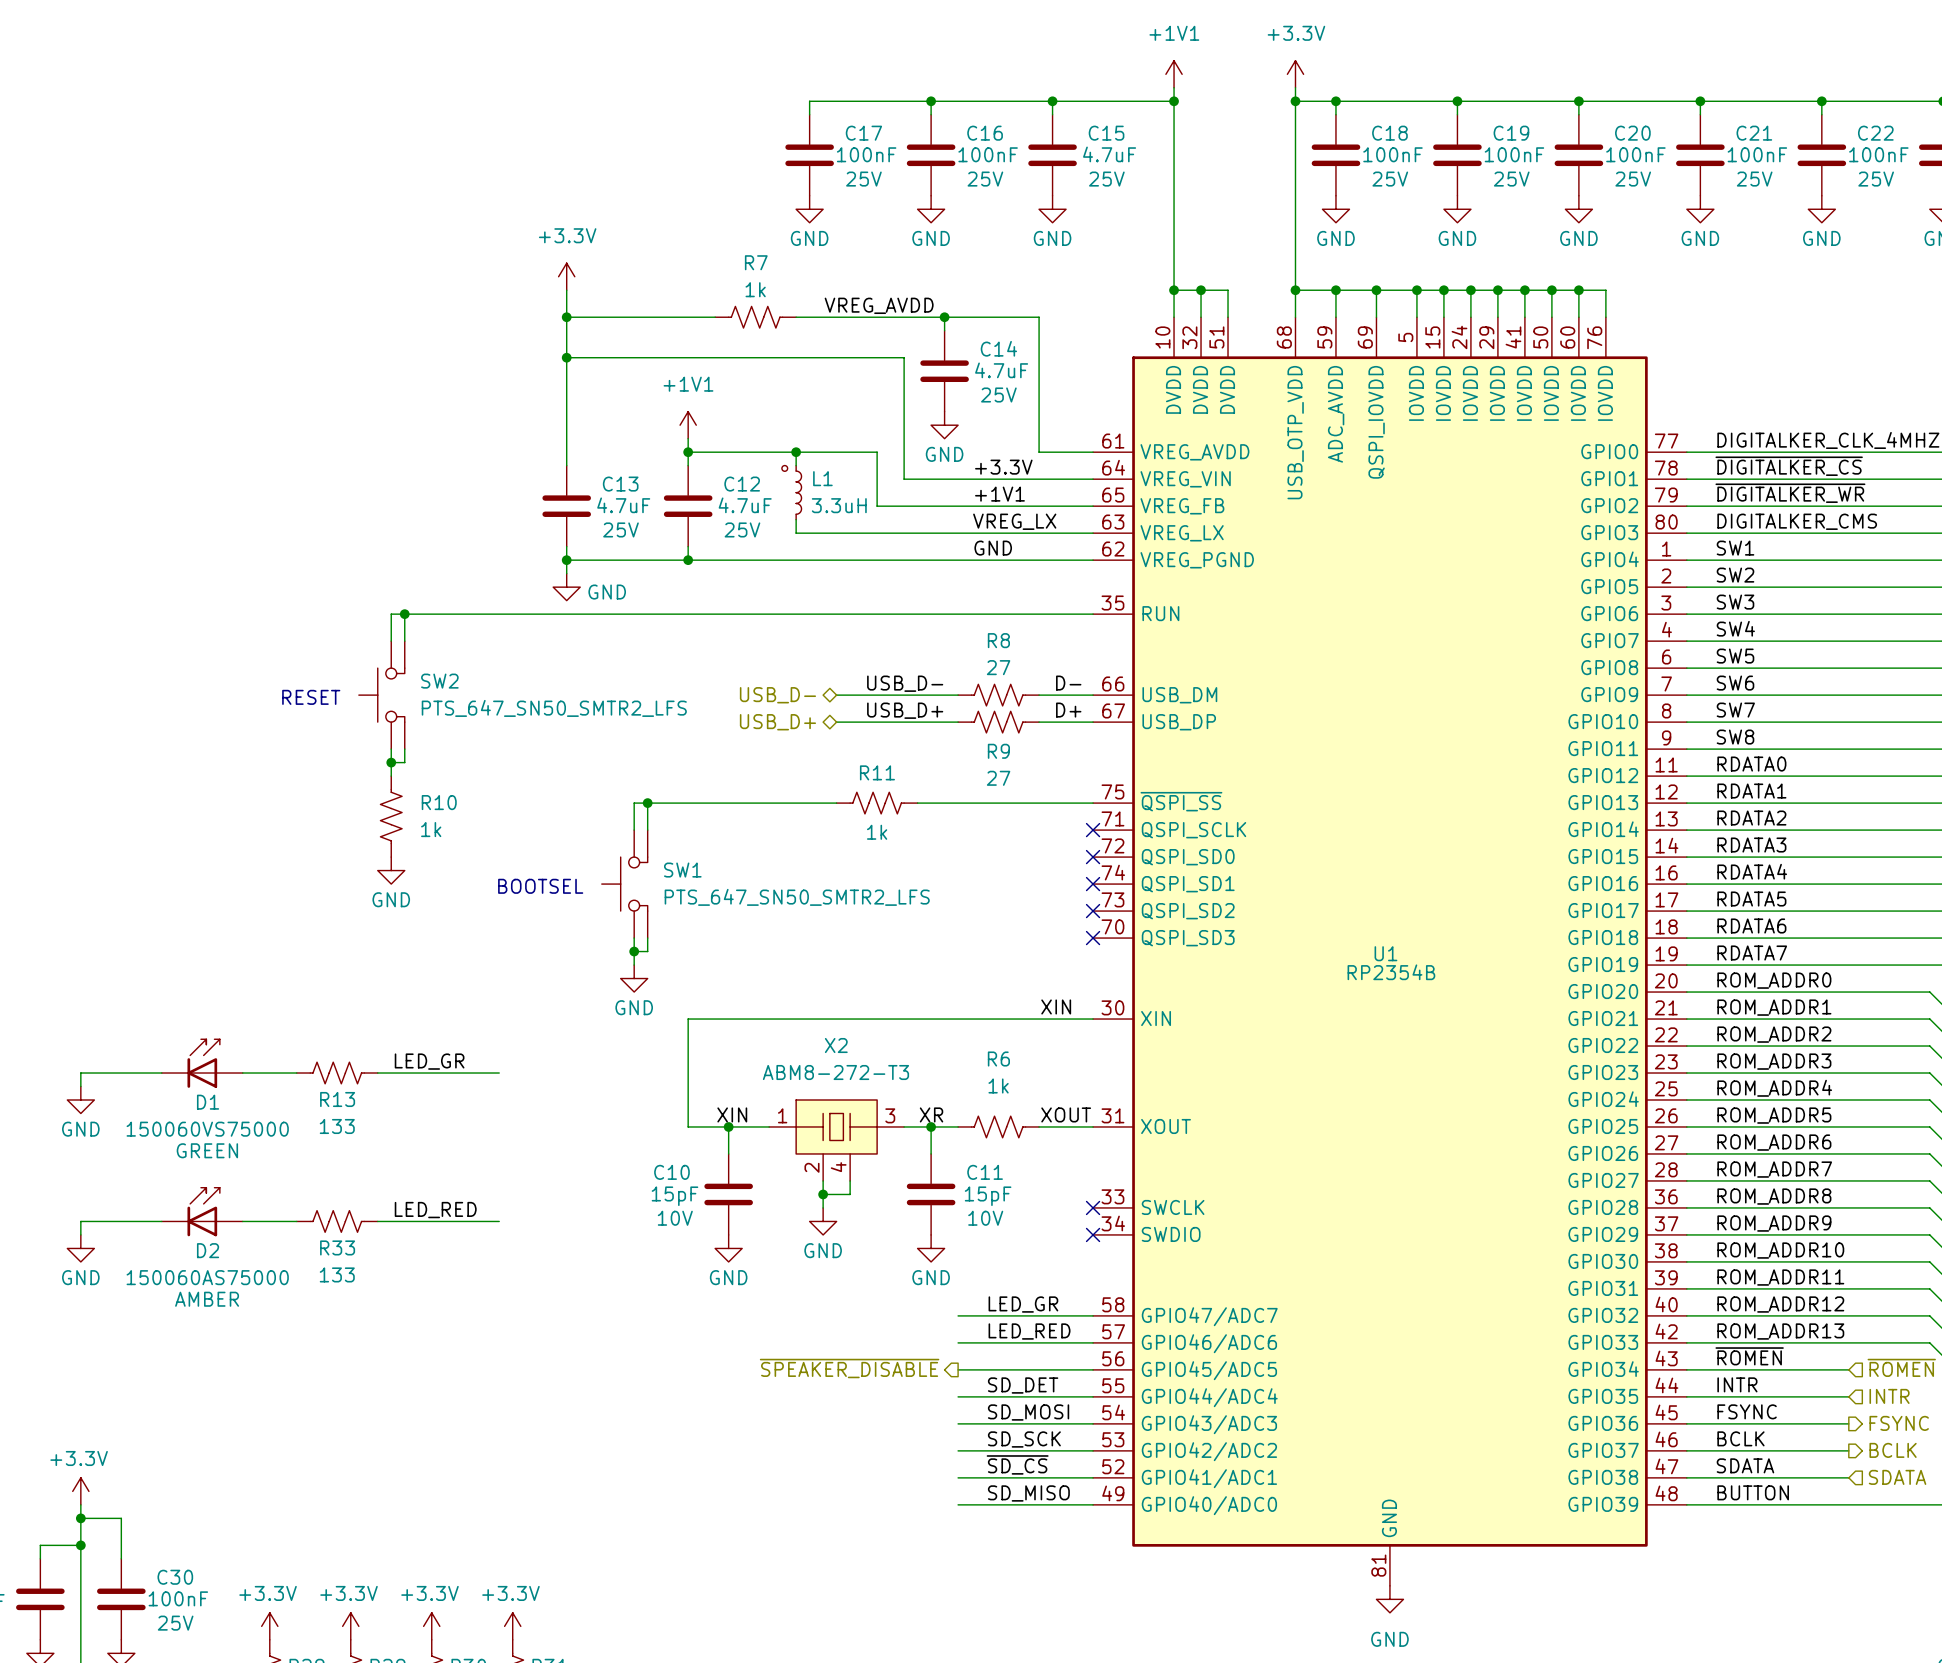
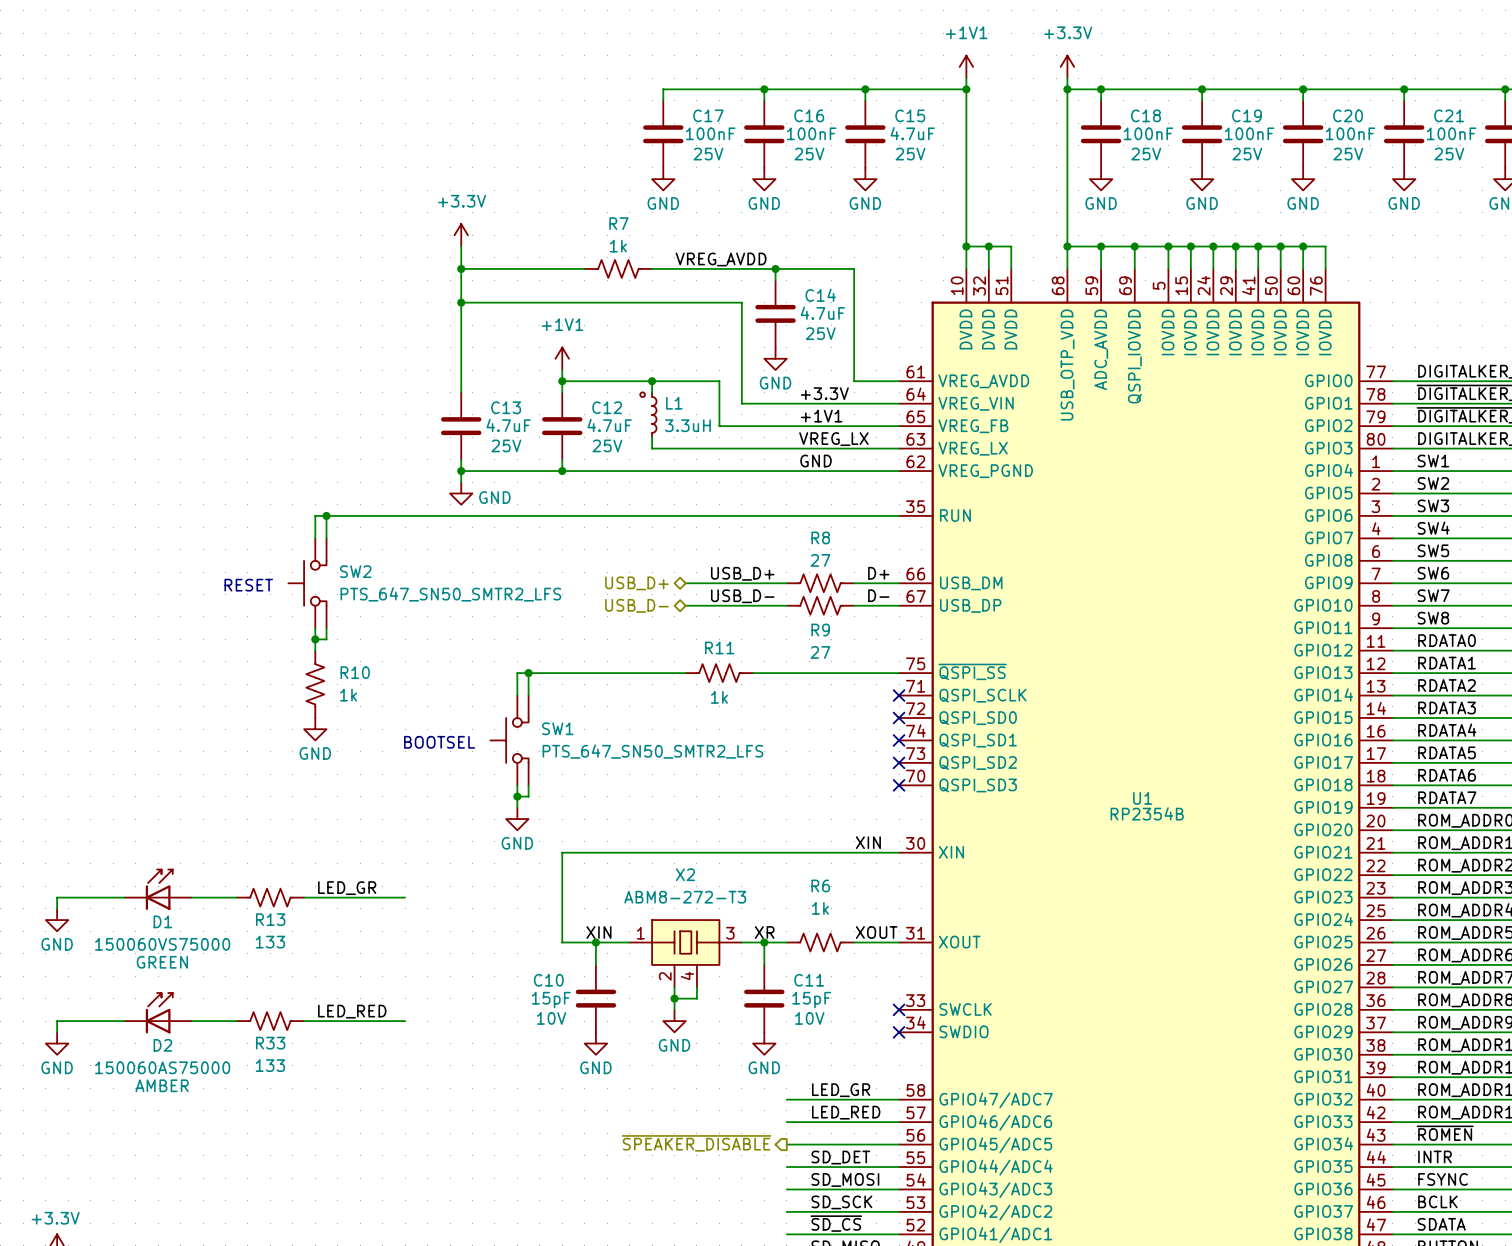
label: USB_D- (905, 683) -> USB_D+ (742, 573)
label: D- (1068, 683) -> D+ (878, 573)
hierarchical label: USB_D- (777, 695) -> USB_D+ (636, 583)
label: USB_D+ (905, 710) -> USB_D- (742, 596)
label: D+ (1068, 710) -> D- (878, 595)
hierarchical label: USB_D+ (777, 722) -> USB_D- (636, 605)

